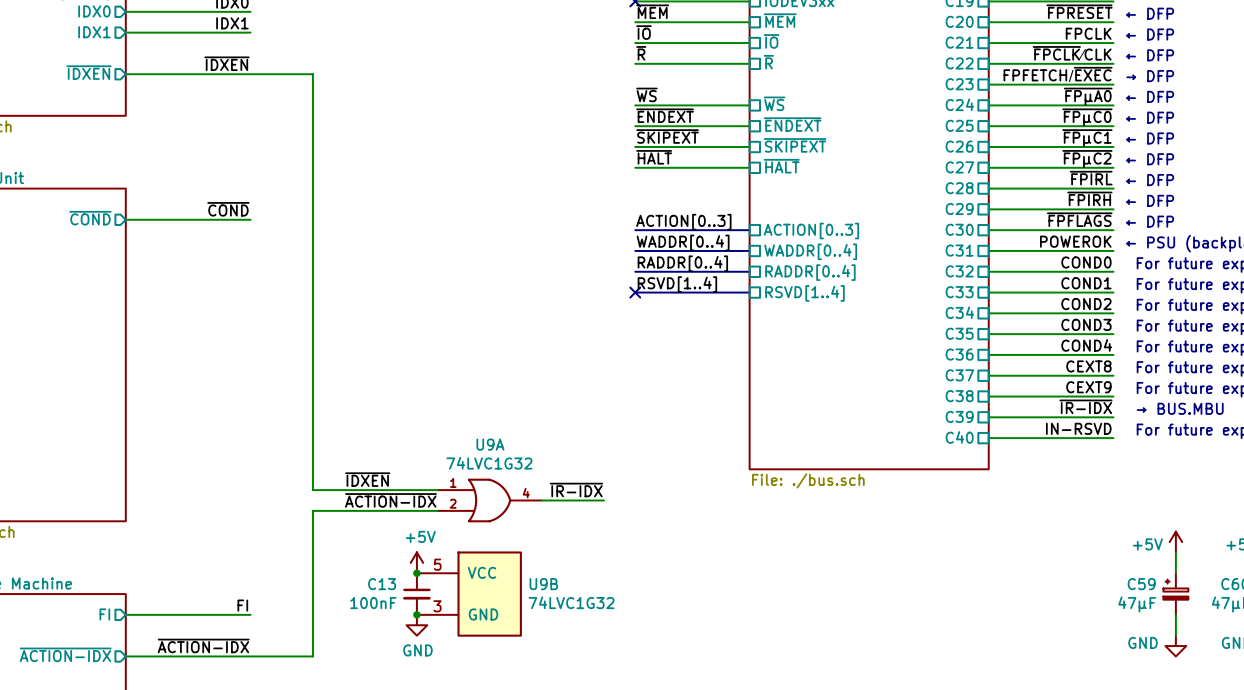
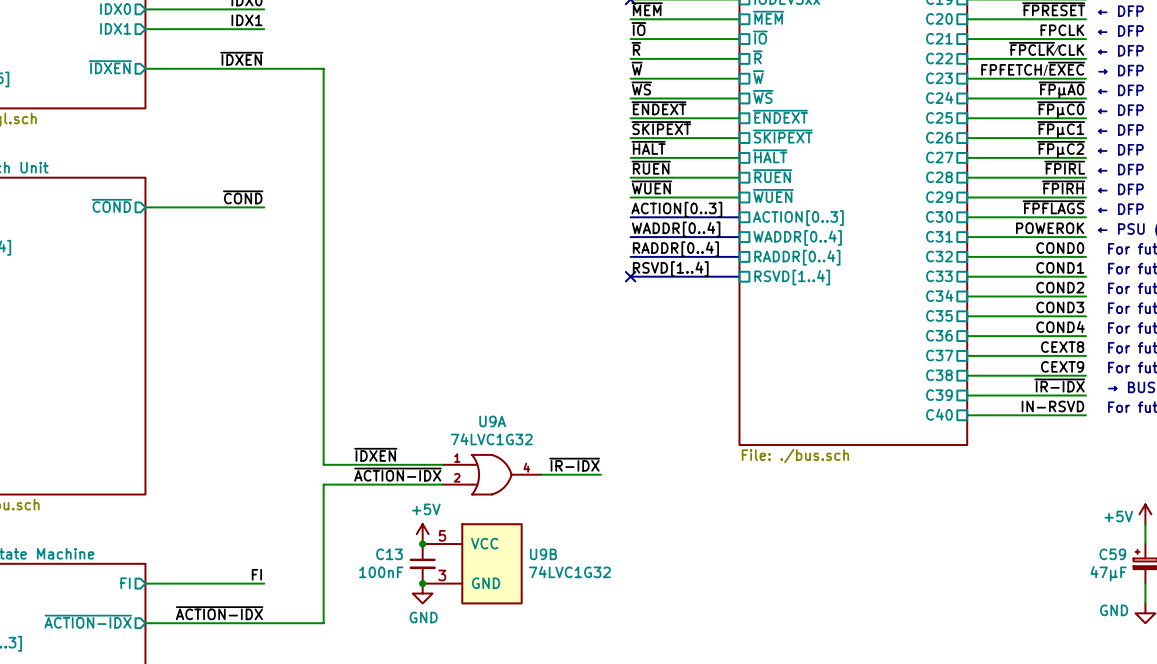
label: none -> ~{W} (637, 68)
sheet pin: none -> ~{W} (758, 77)
wire: none -> (630, 78) (739, 78)
label: none -> ~{RUEN} (651, 167)
sheet pin: none -> ~{RUEN} (772, 176)
wire: none -> (630, 177) (739, 177)
label: none -> ~{WUEN} (651, 187)
sheet pin: none -> ~{WUEN} (773, 195)
wire: none -> (630, 197) (739, 197)

